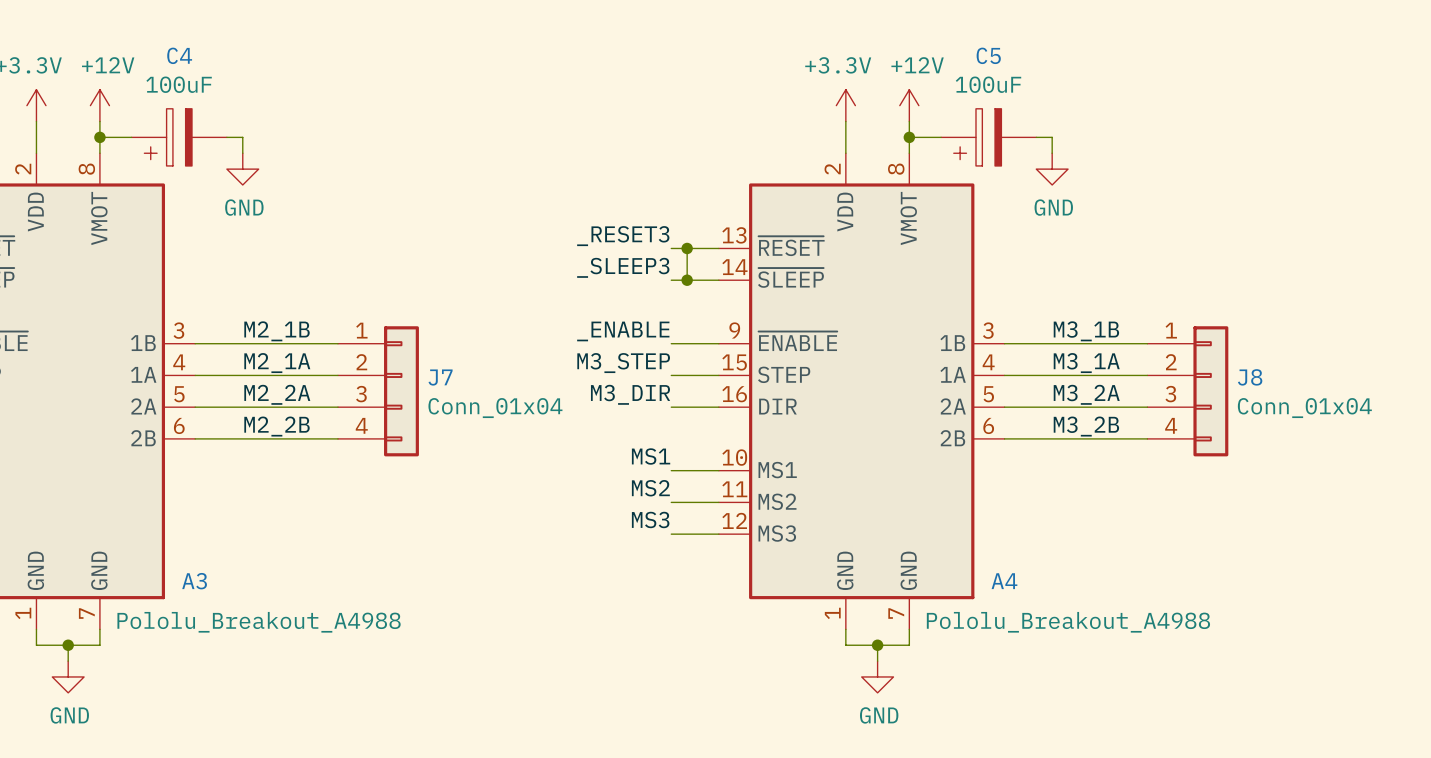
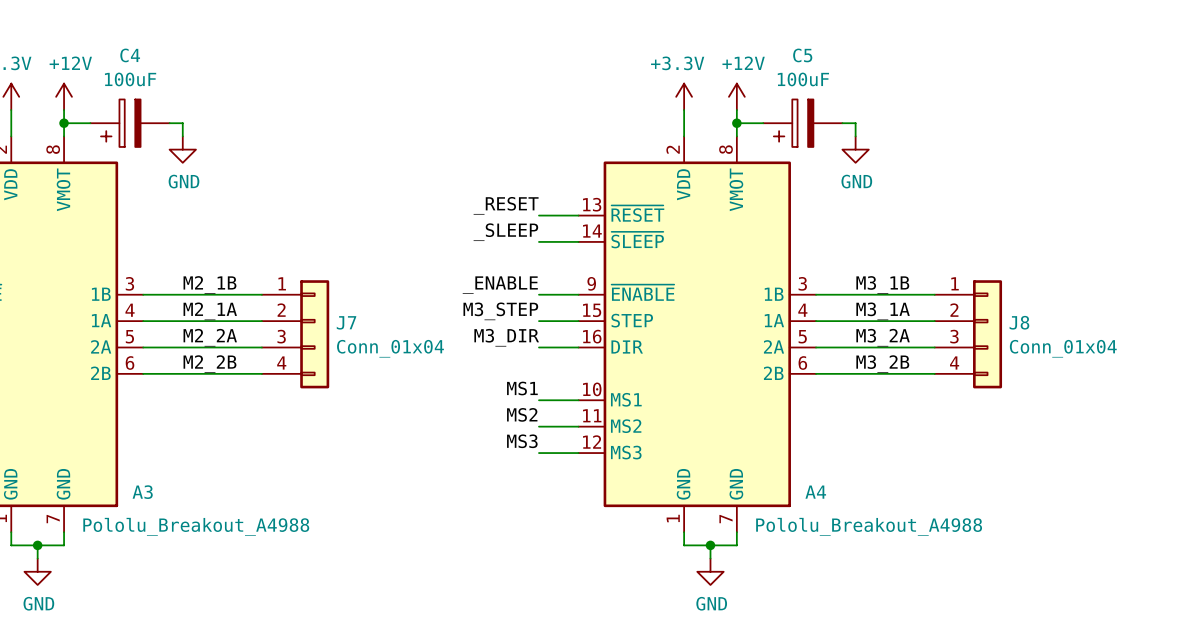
label: _RESET3 (623, 236) -> _RESET (506, 205)
wire: (687, 248) (687, 280) -> none
junction: (687, 248) -> none
label: _SLEEP3 (623, 267) -> _SLEEP (505, 232)
junction: (687, 280) -> none

